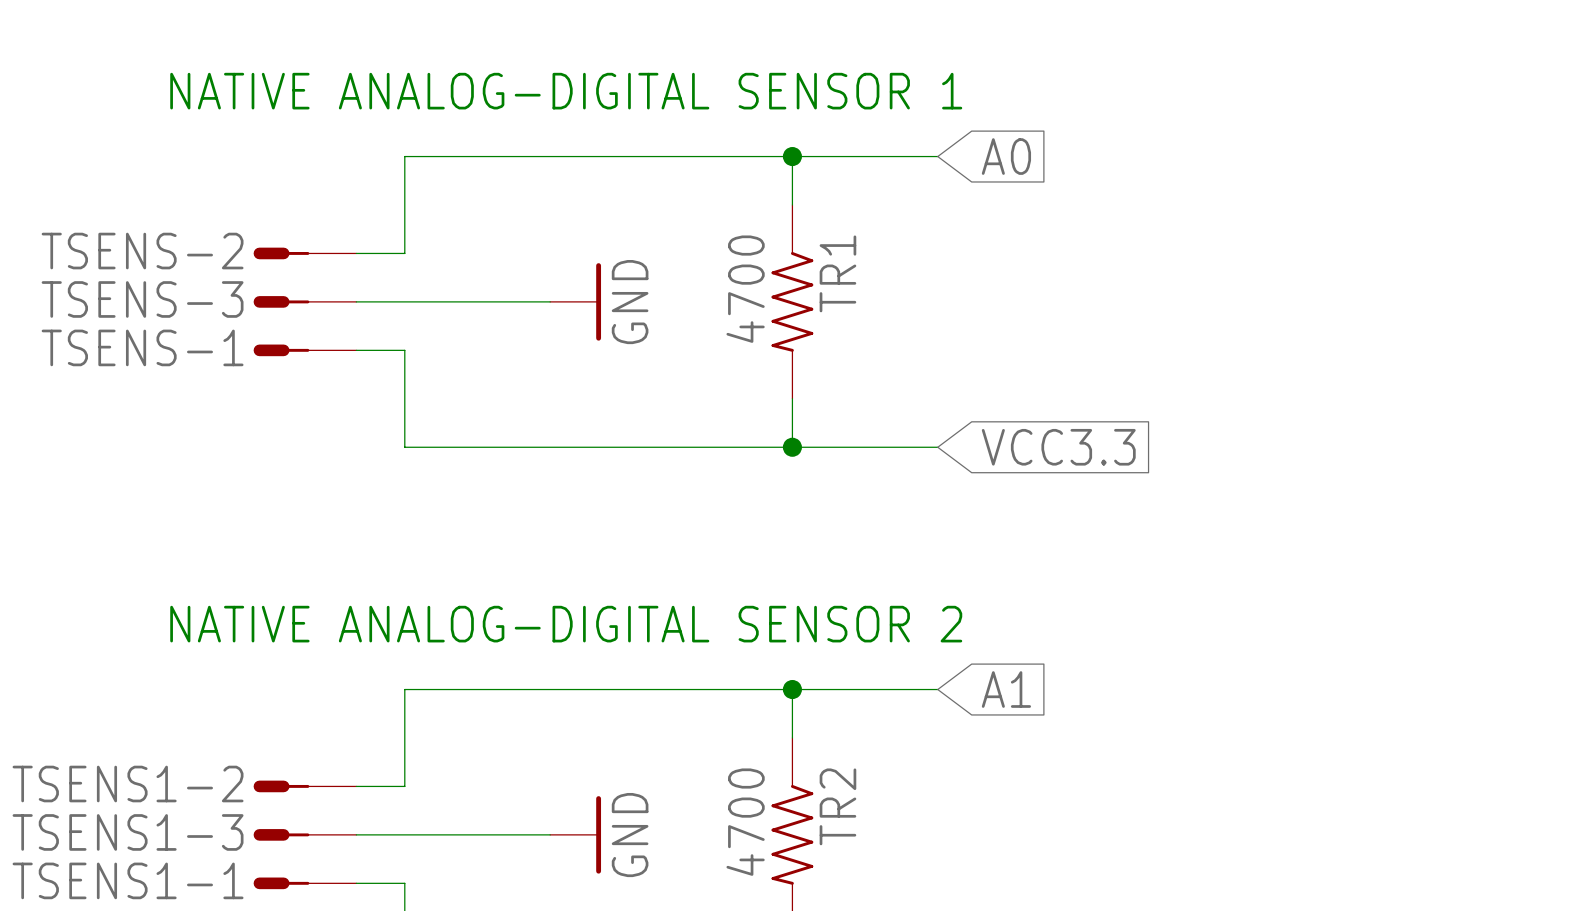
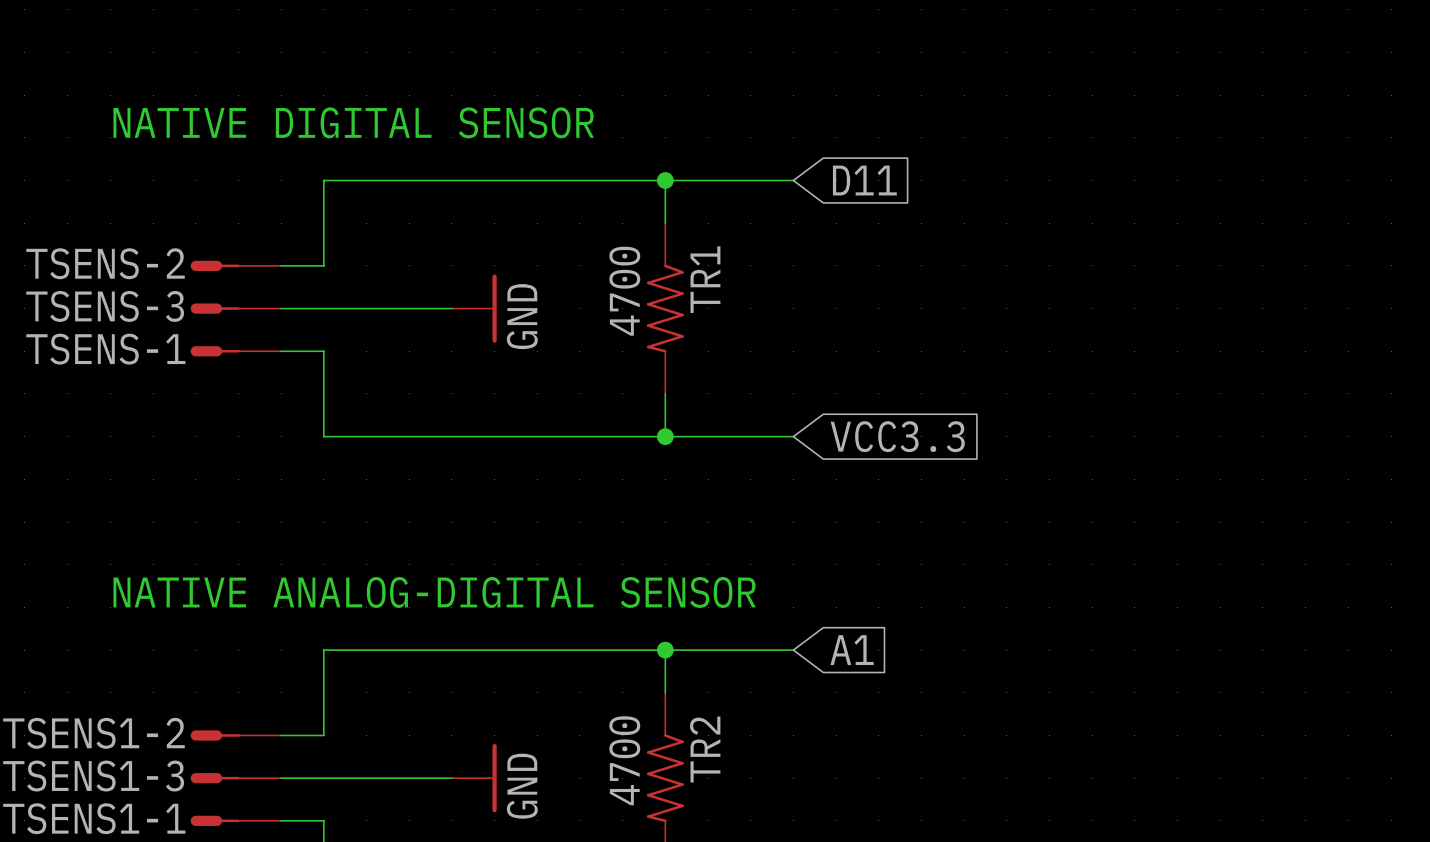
text: NATIVE ANALOG-DIGITAL SENSOR 1 (566, 91) -> NATIVE DIGITAL SENSOR (353, 122)
global label: A0 (1006, 156) -> D11 (864, 180)
text: NATIVE ANALOG-DIGITAL SENSOR 2 (566, 624) -> NATIVE ANALOG-DIGITAL SENSOR (434, 592)

